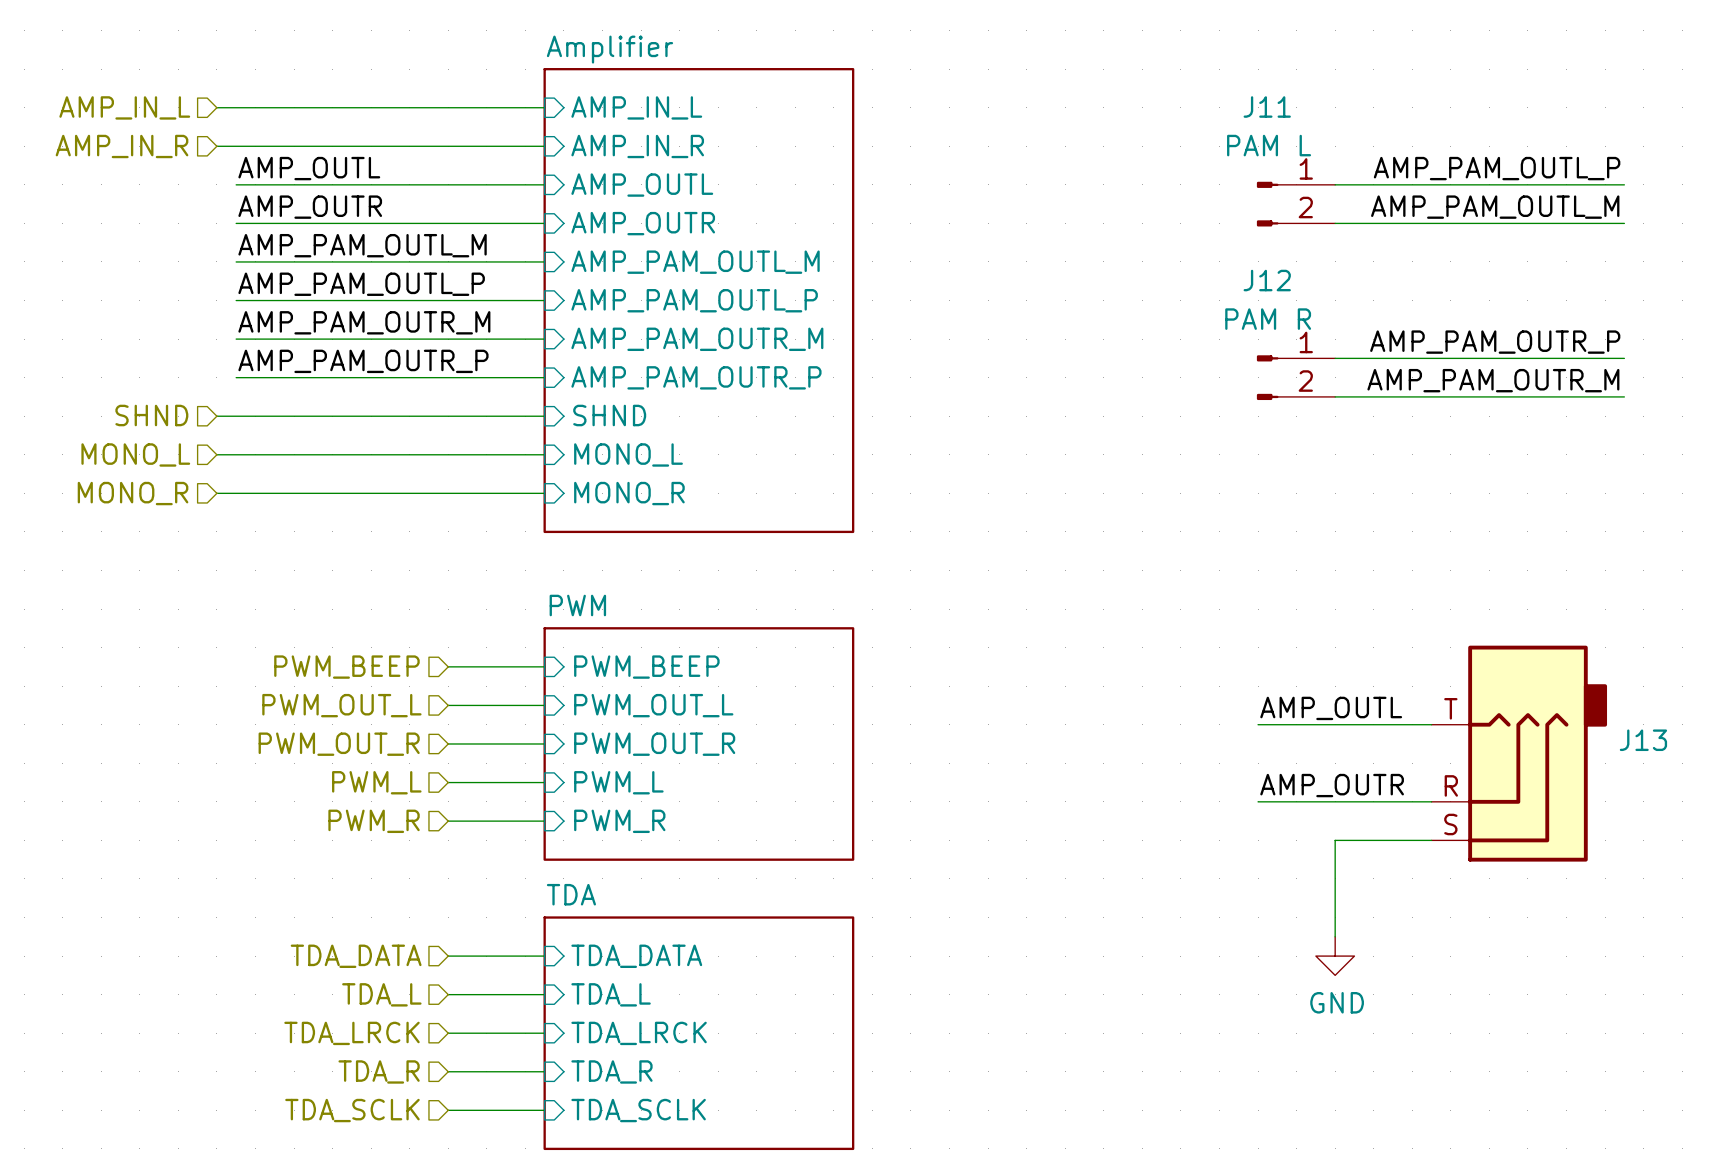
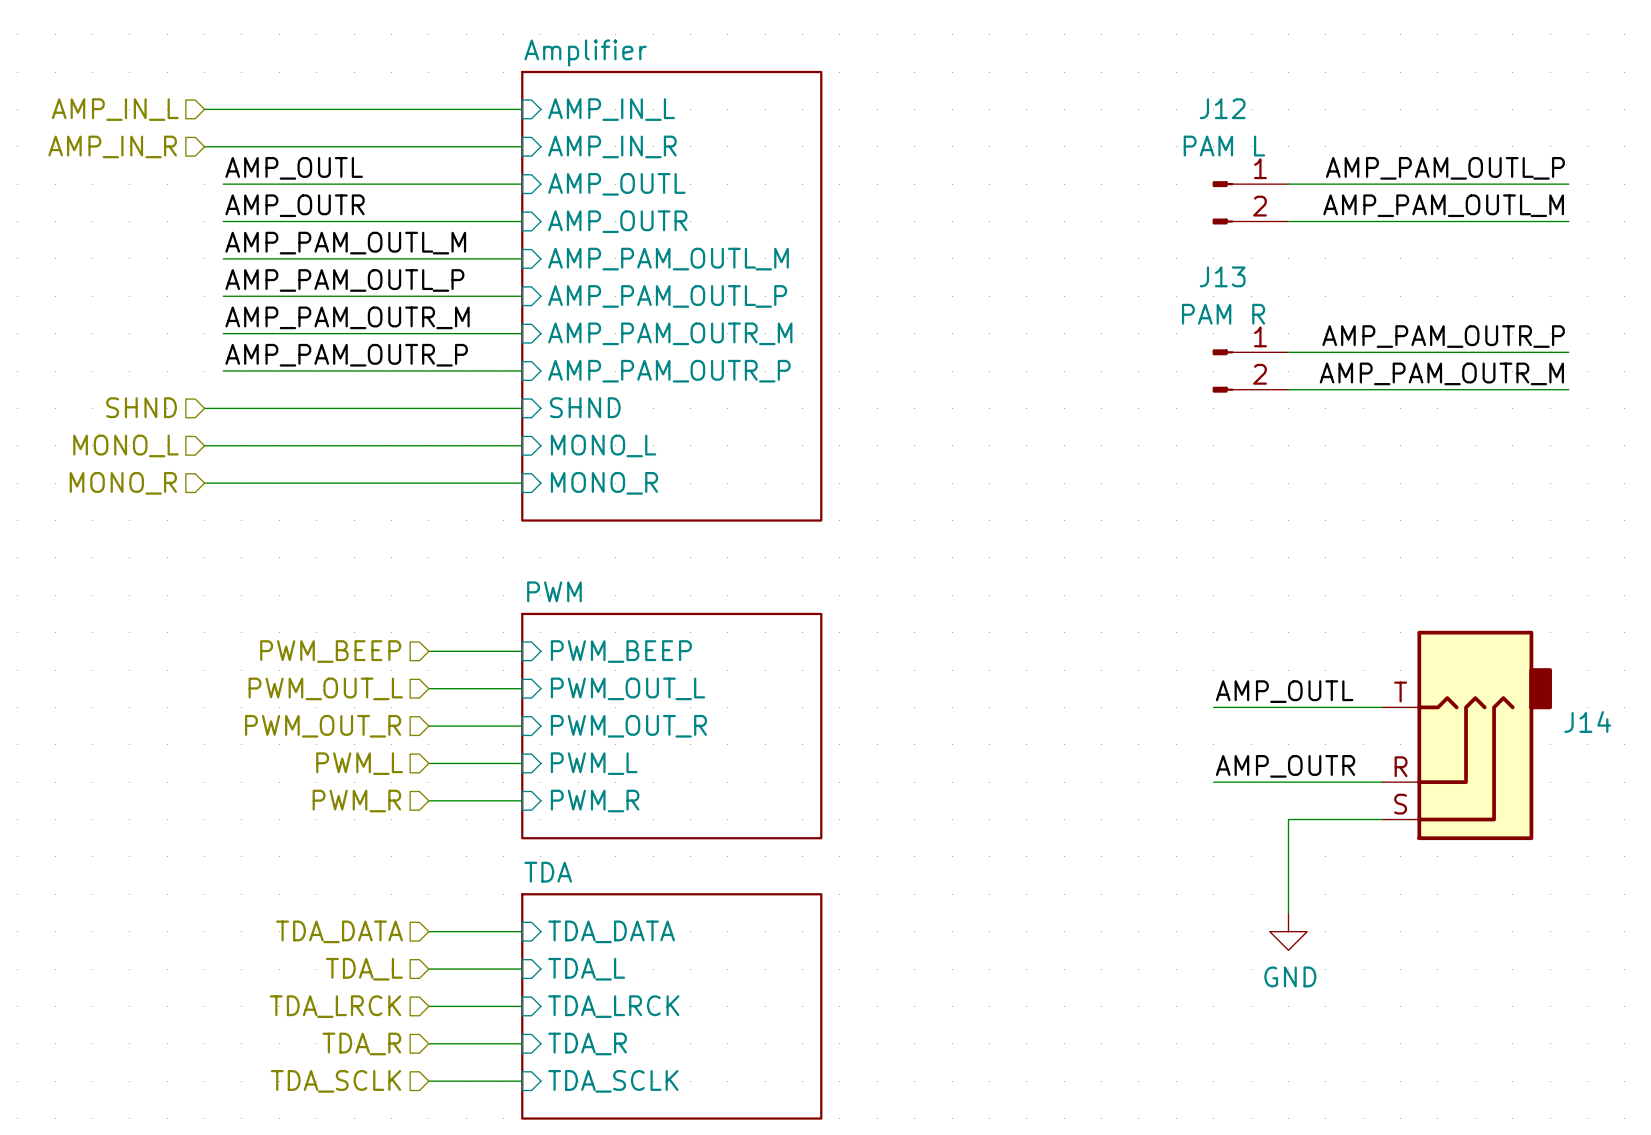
J11 name: J11 (1267, 107) -> J12 (1222, 108)
J12 name: J12 (1267, 280) -> J13 (1222, 276)
J13 name: J13 (1643, 740) -> J14 (1587, 722)

